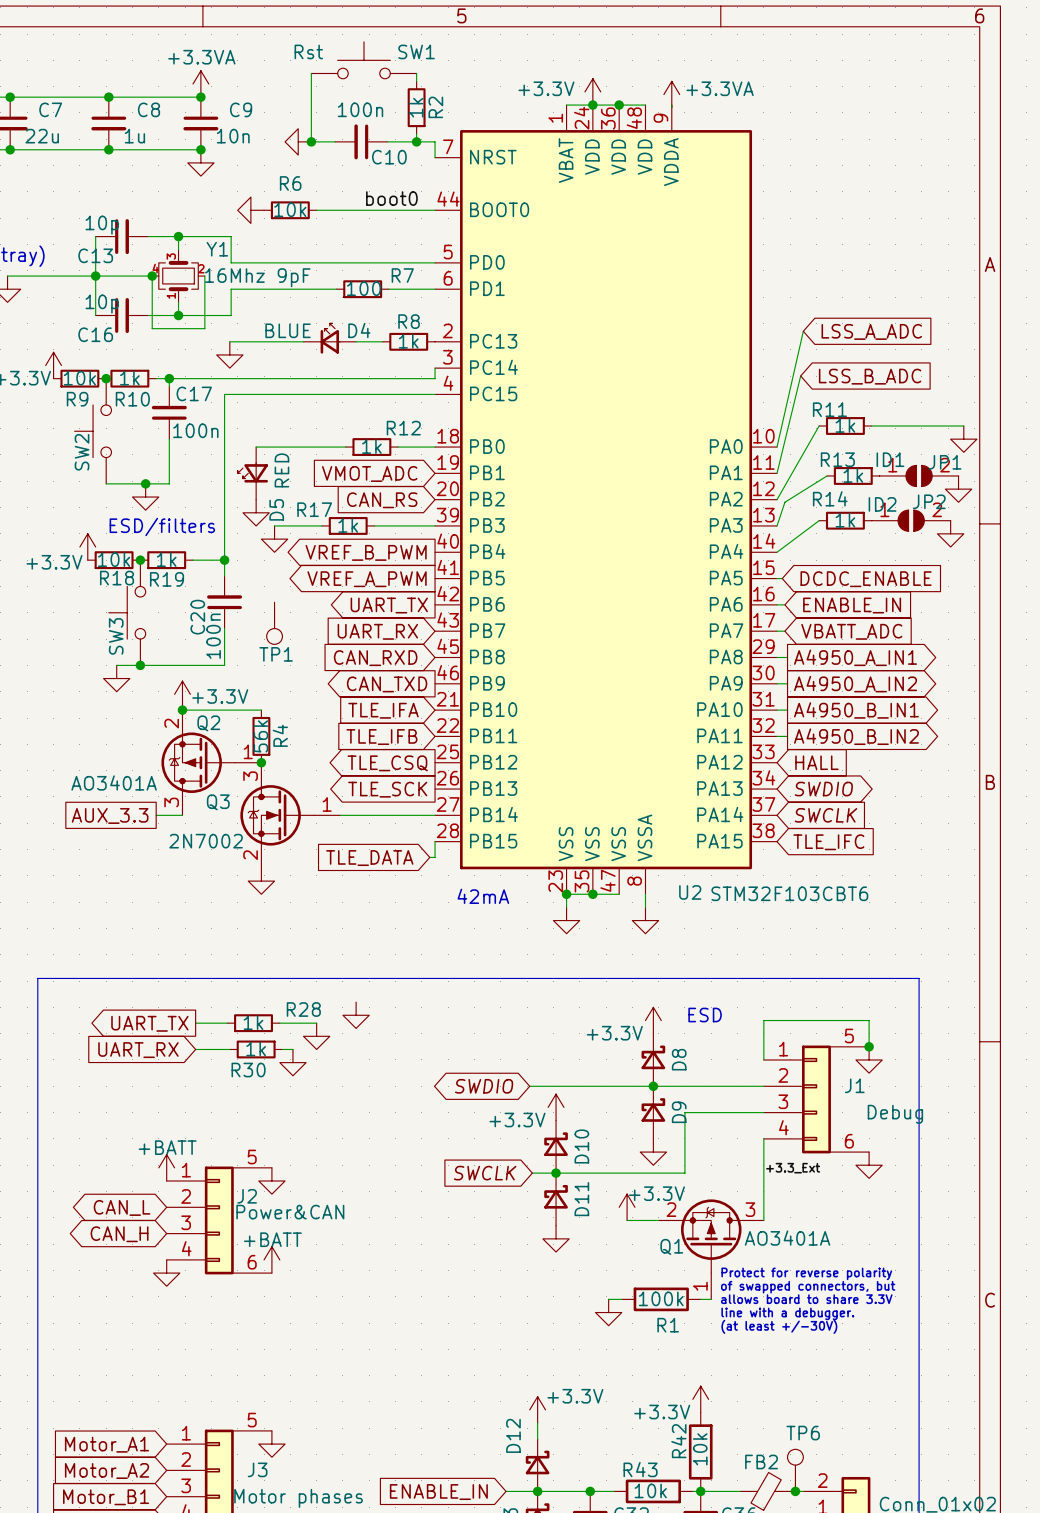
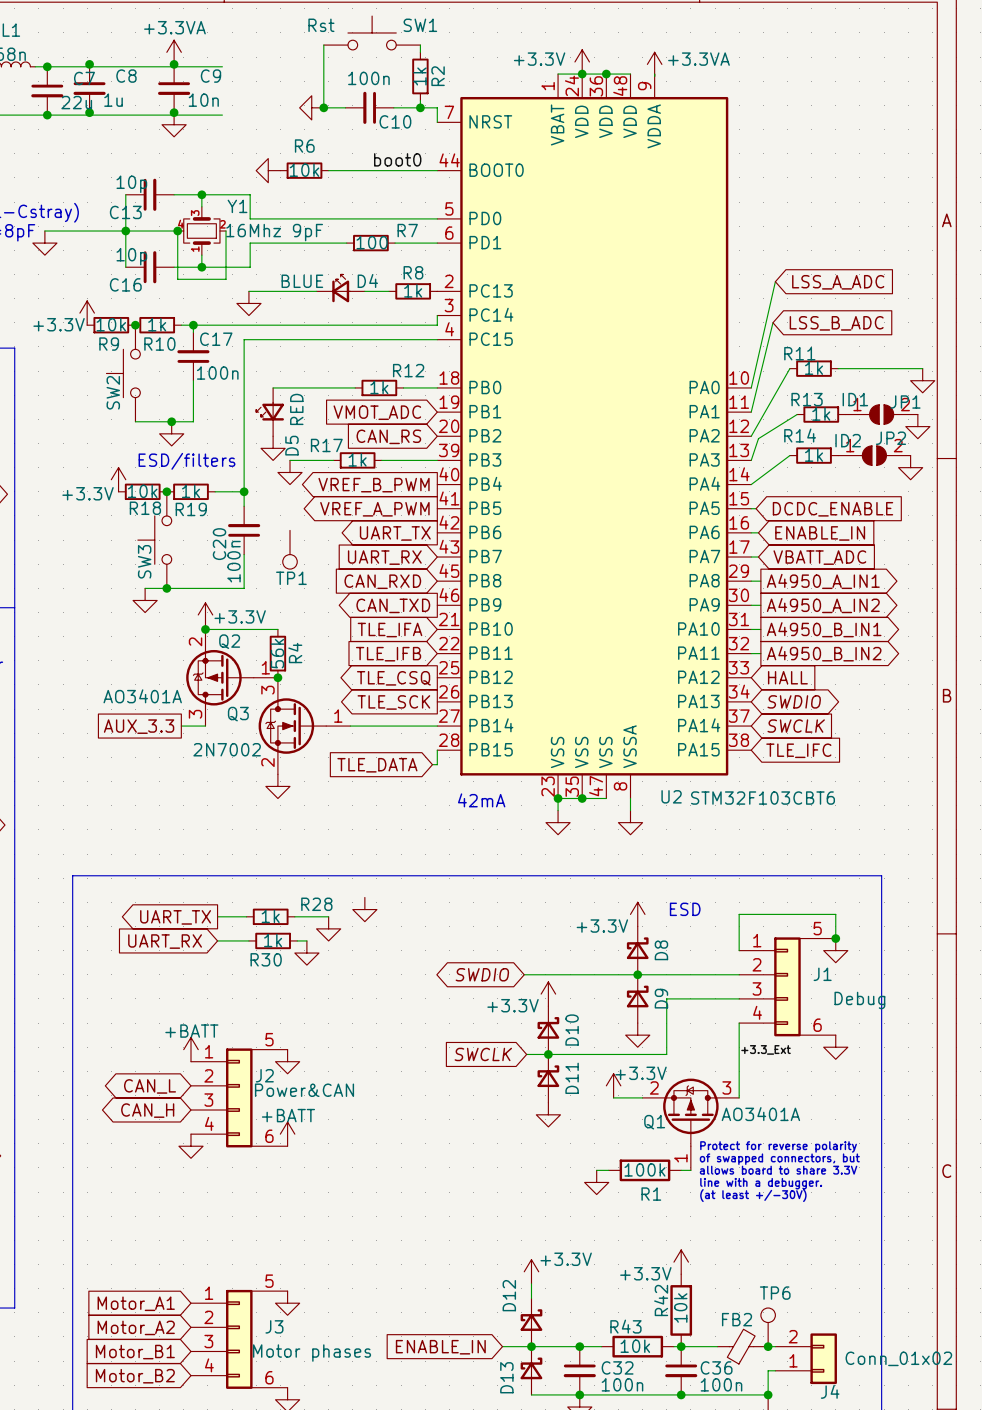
power symbol position: +3.3VA (200, 84) -> +3.3VA (174, 52)
junction: none -> (89, 64)
junction: none -> (174, 64)
junction: (108, 97) -> none
junction: (200, 97) -> none
C8 position: (108, 123) -> (89, 88)
C9 position: (200, 123) -> (174, 88)
junction: none -> (89, 112)
junction: none -> (174, 112)
junction: (108, 149) -> none
junction: (200, 149) -> none
power symbol position: (200, 162) -> (174, 124)

